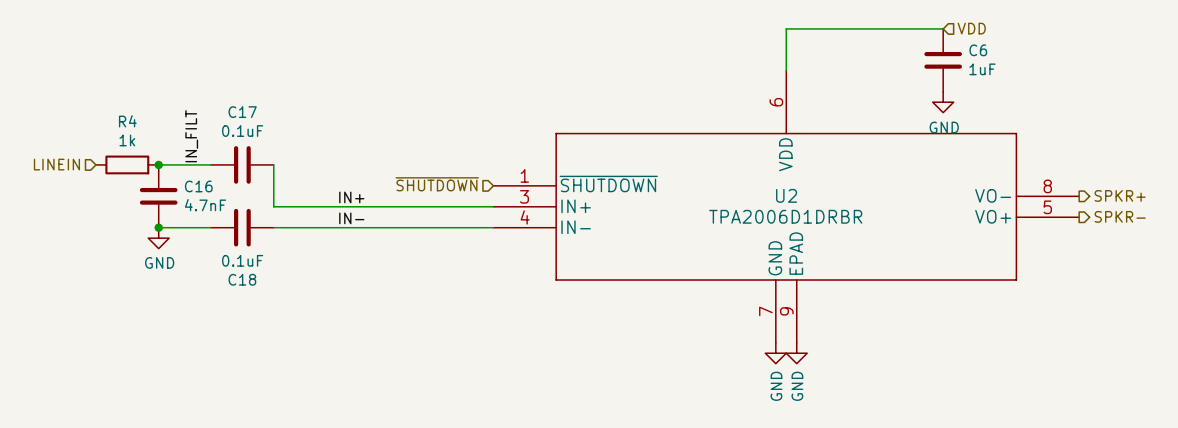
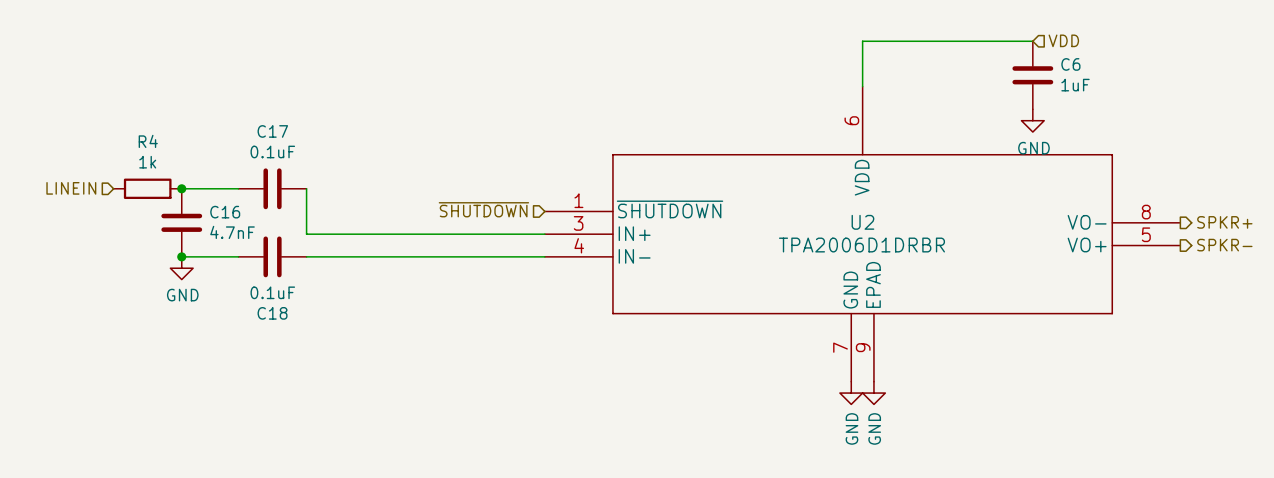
label: IN_FILT (191, 136) -> none
label: IN+ (351, 197) -> none
label: IN- (351, 218) -> none

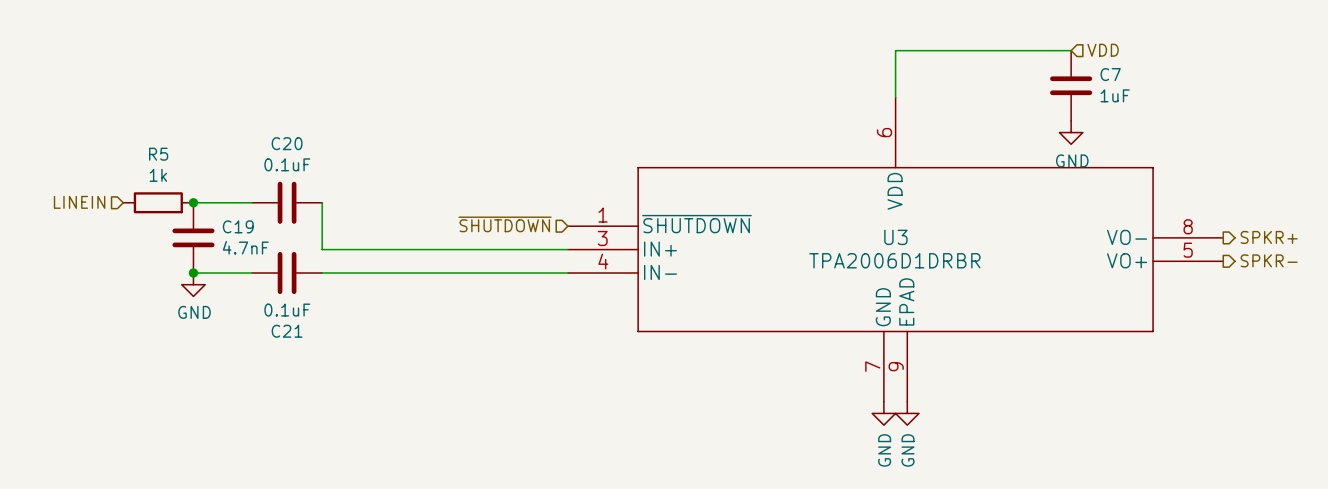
C6 name: C6 (1070, 64) -> C7 (1110, 74)
C17 name: C17 (272, 131) -> C20 (287, 143)
R4 name: R4 (148, 141) -> R5 (158, 154)
C16 name: C16 (225, 212) -> C19 (238, 226)
U2 name: U2 (862, 222) -> U3 (895, 237)
C18 name: C18 (272, 313) -> C21 (287, 331)

